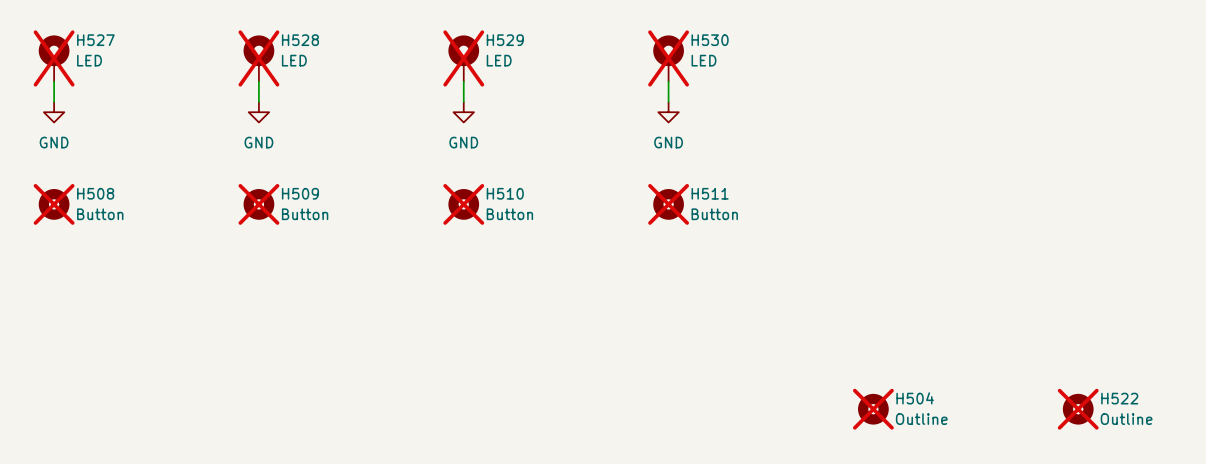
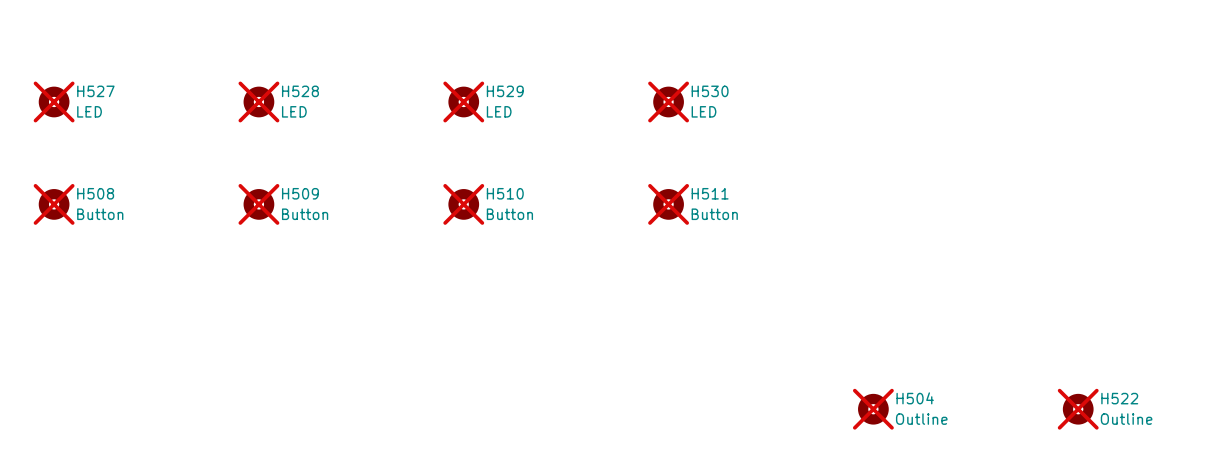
H527 symbol: [38, 35, 70, 82] -> [38, 86, 70, 118]
H528 symbol: [243, 35, 275, 82] -> [243, 86, 275, 118]
H529 symbol: [448, 35, 480, 82] -> [448, 86, 480, 118]
H530 symbol: [653, 35, 684, 82] -> [653, 86, 684, 118]
power symbol: GND (54, 112) -> none
power symbol: GND (258, 112) -> none
power symbol: GND (463, 112) -> none
power symbol: GND (668, 112) -> none

